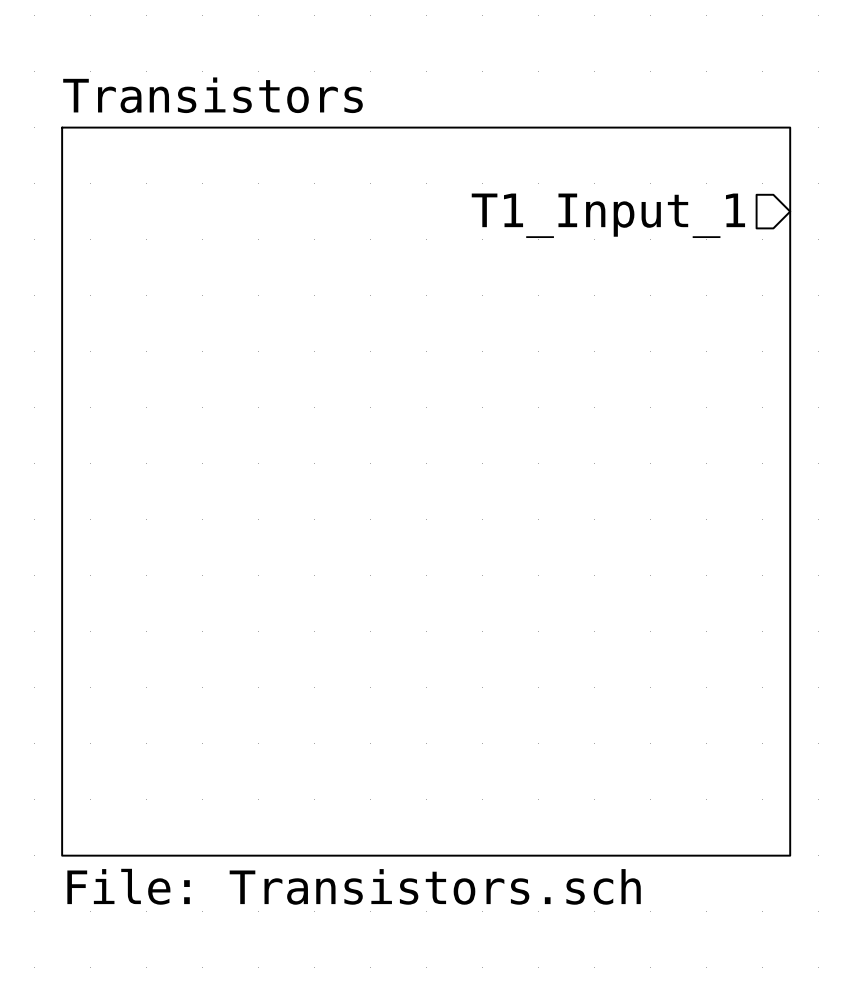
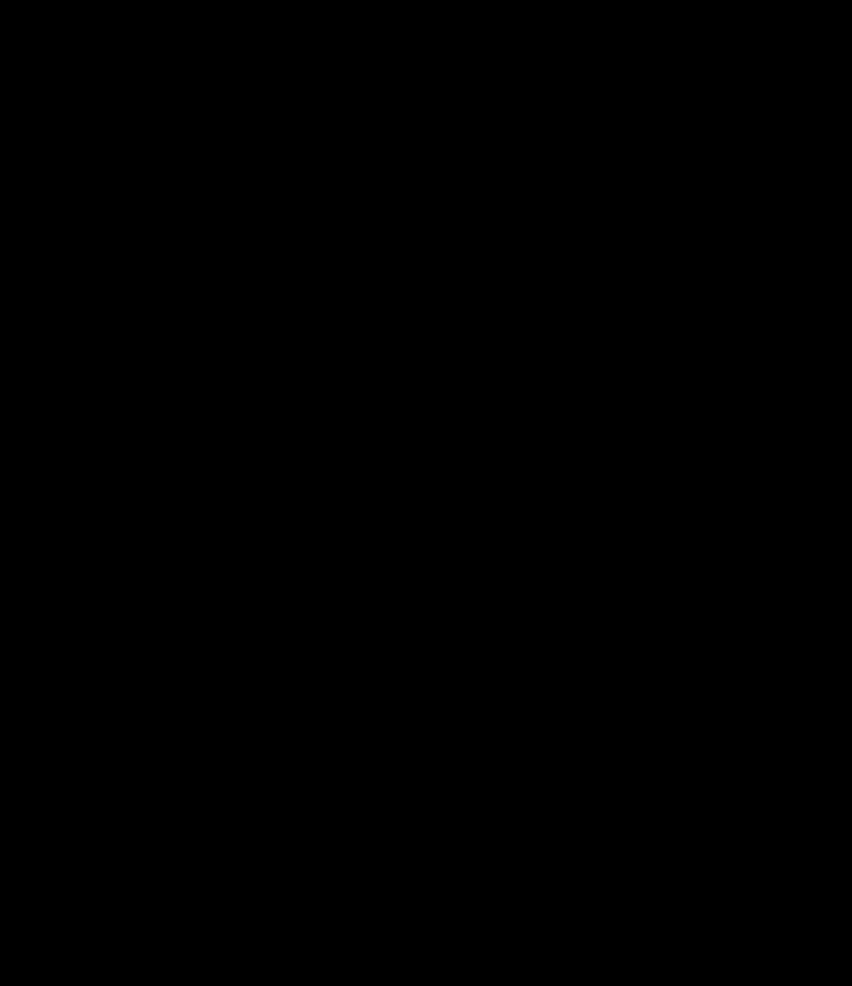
hierarchical label: T1_Input_1 (608, 215) -> none
sheet Transistors: File: Transistors.sch (426, 491) -> none

